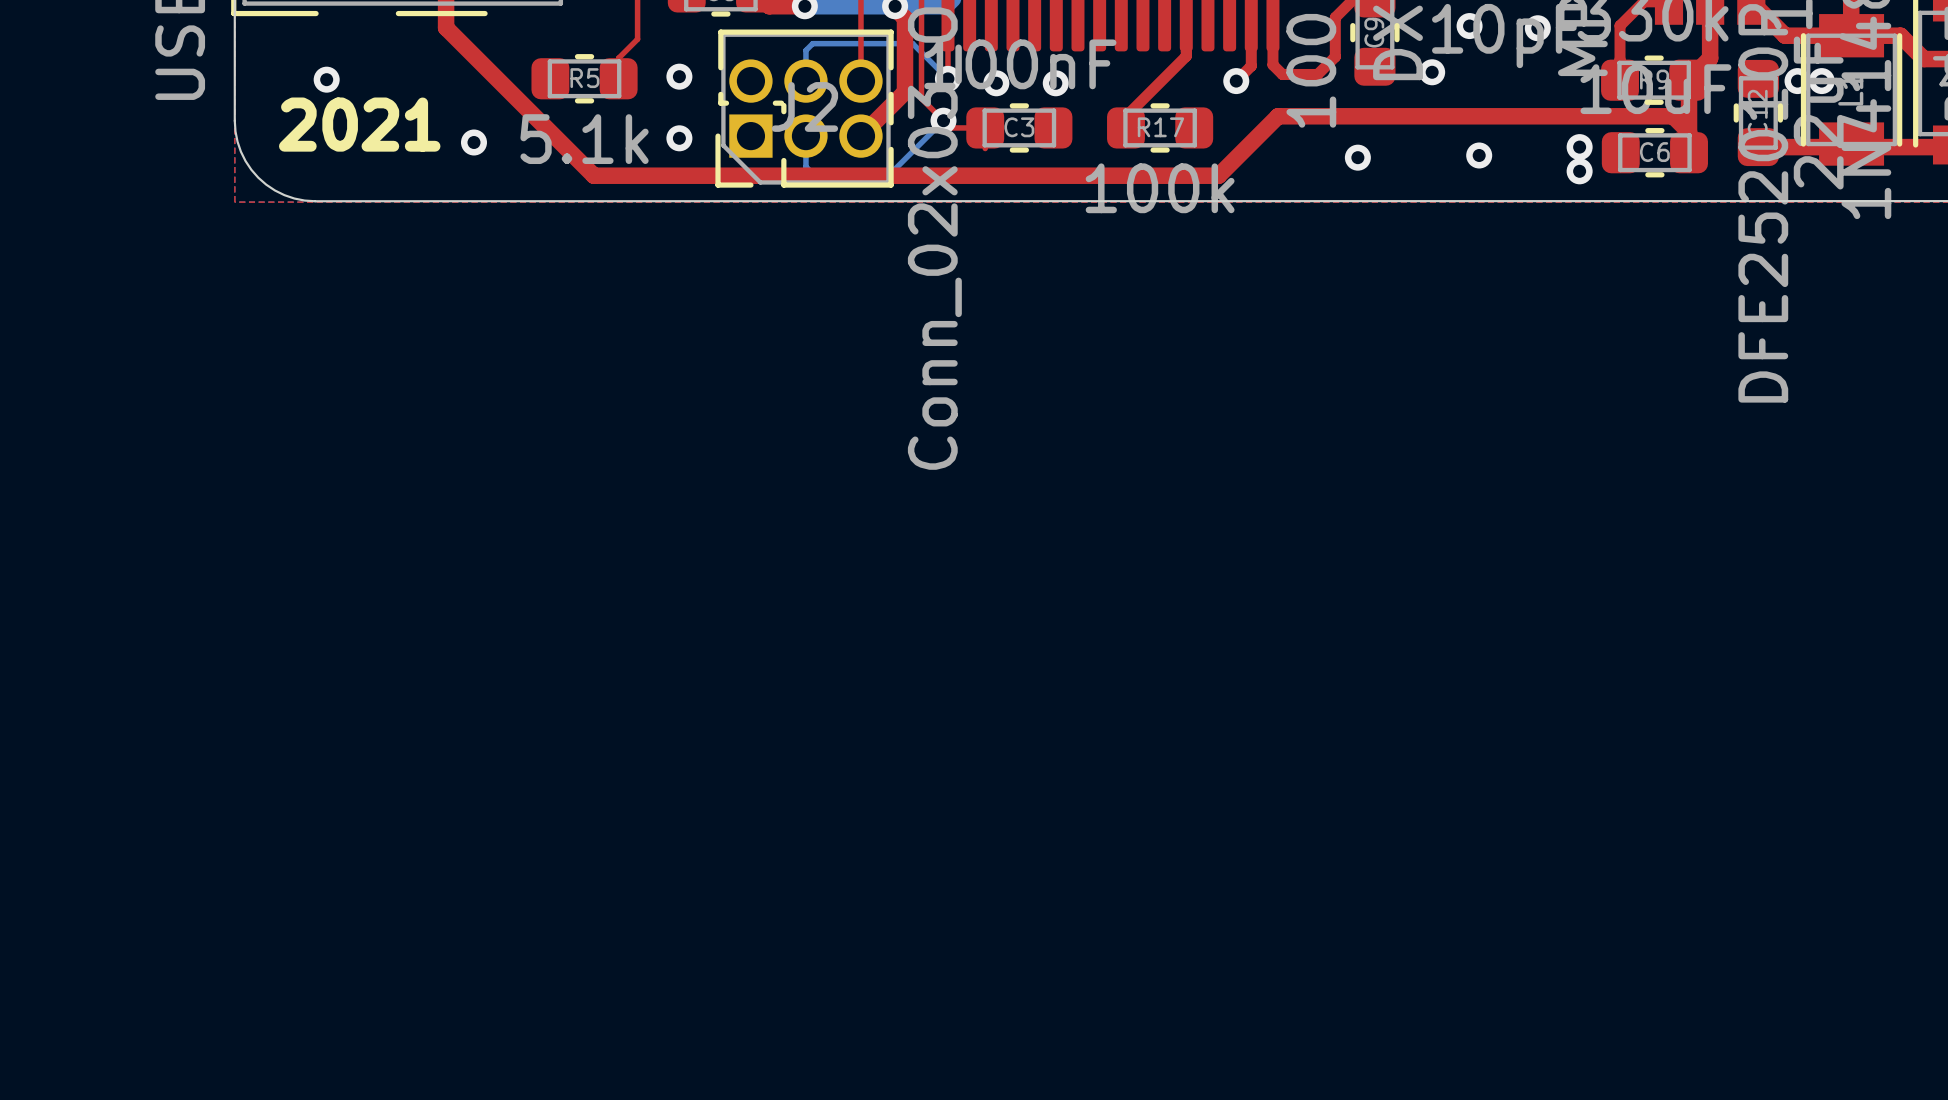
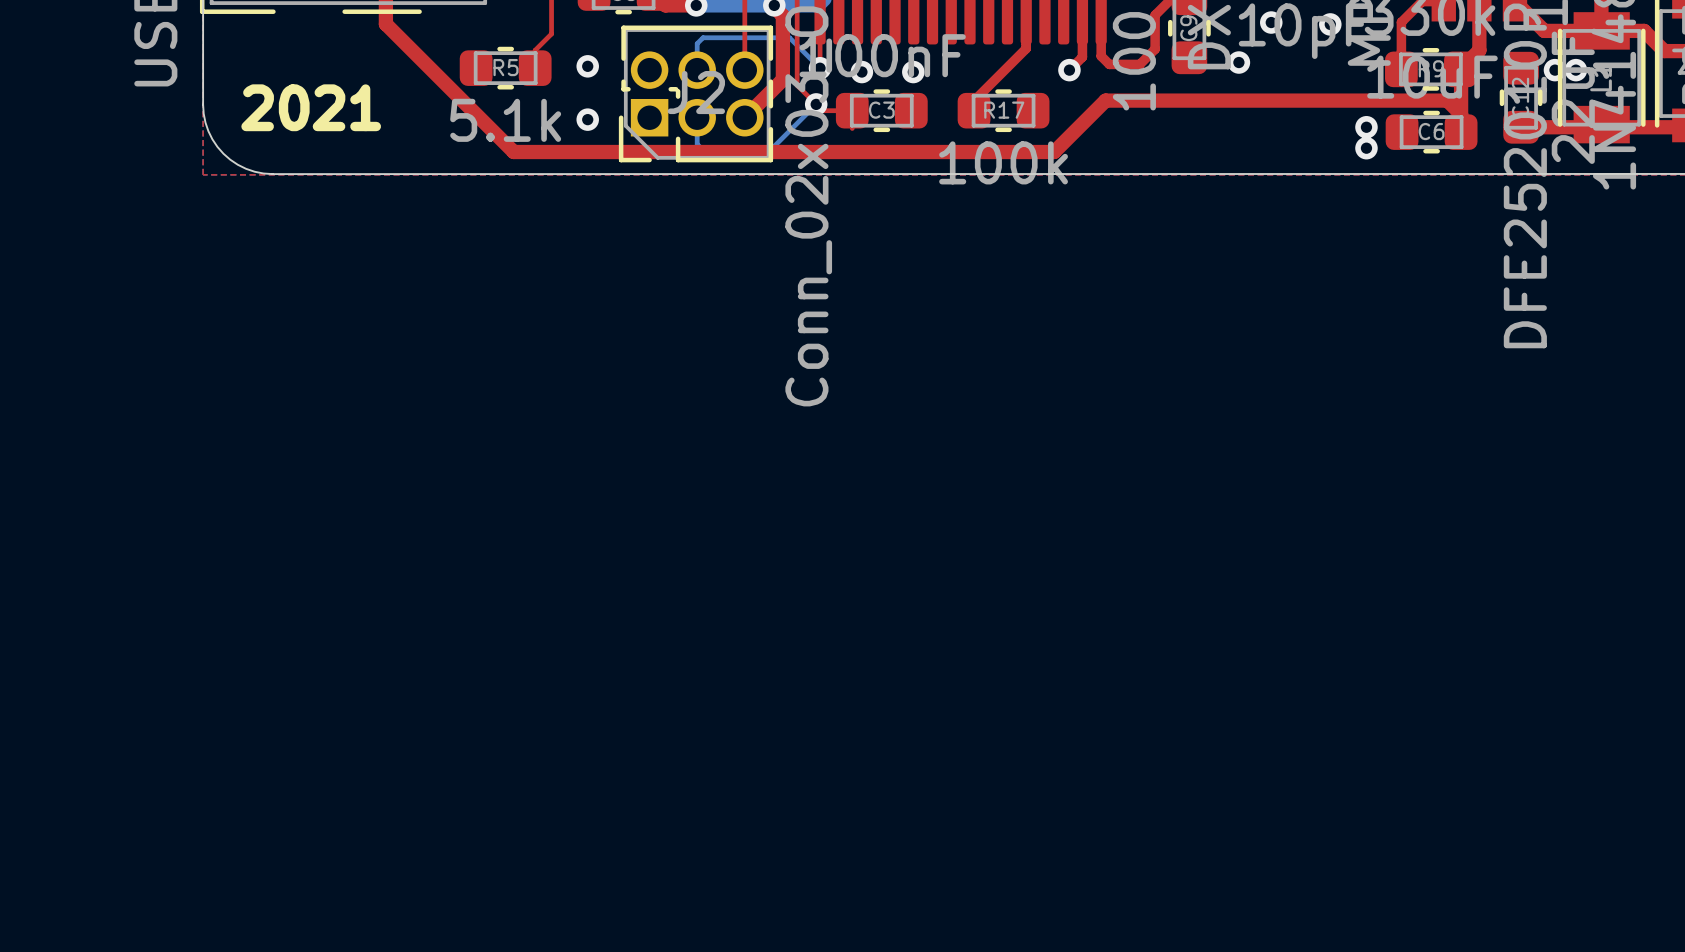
via: (326, 79) -> none
via: (473, 142) -> none
via: (1479, 155) -> none
via: (1357, 157) -> none

